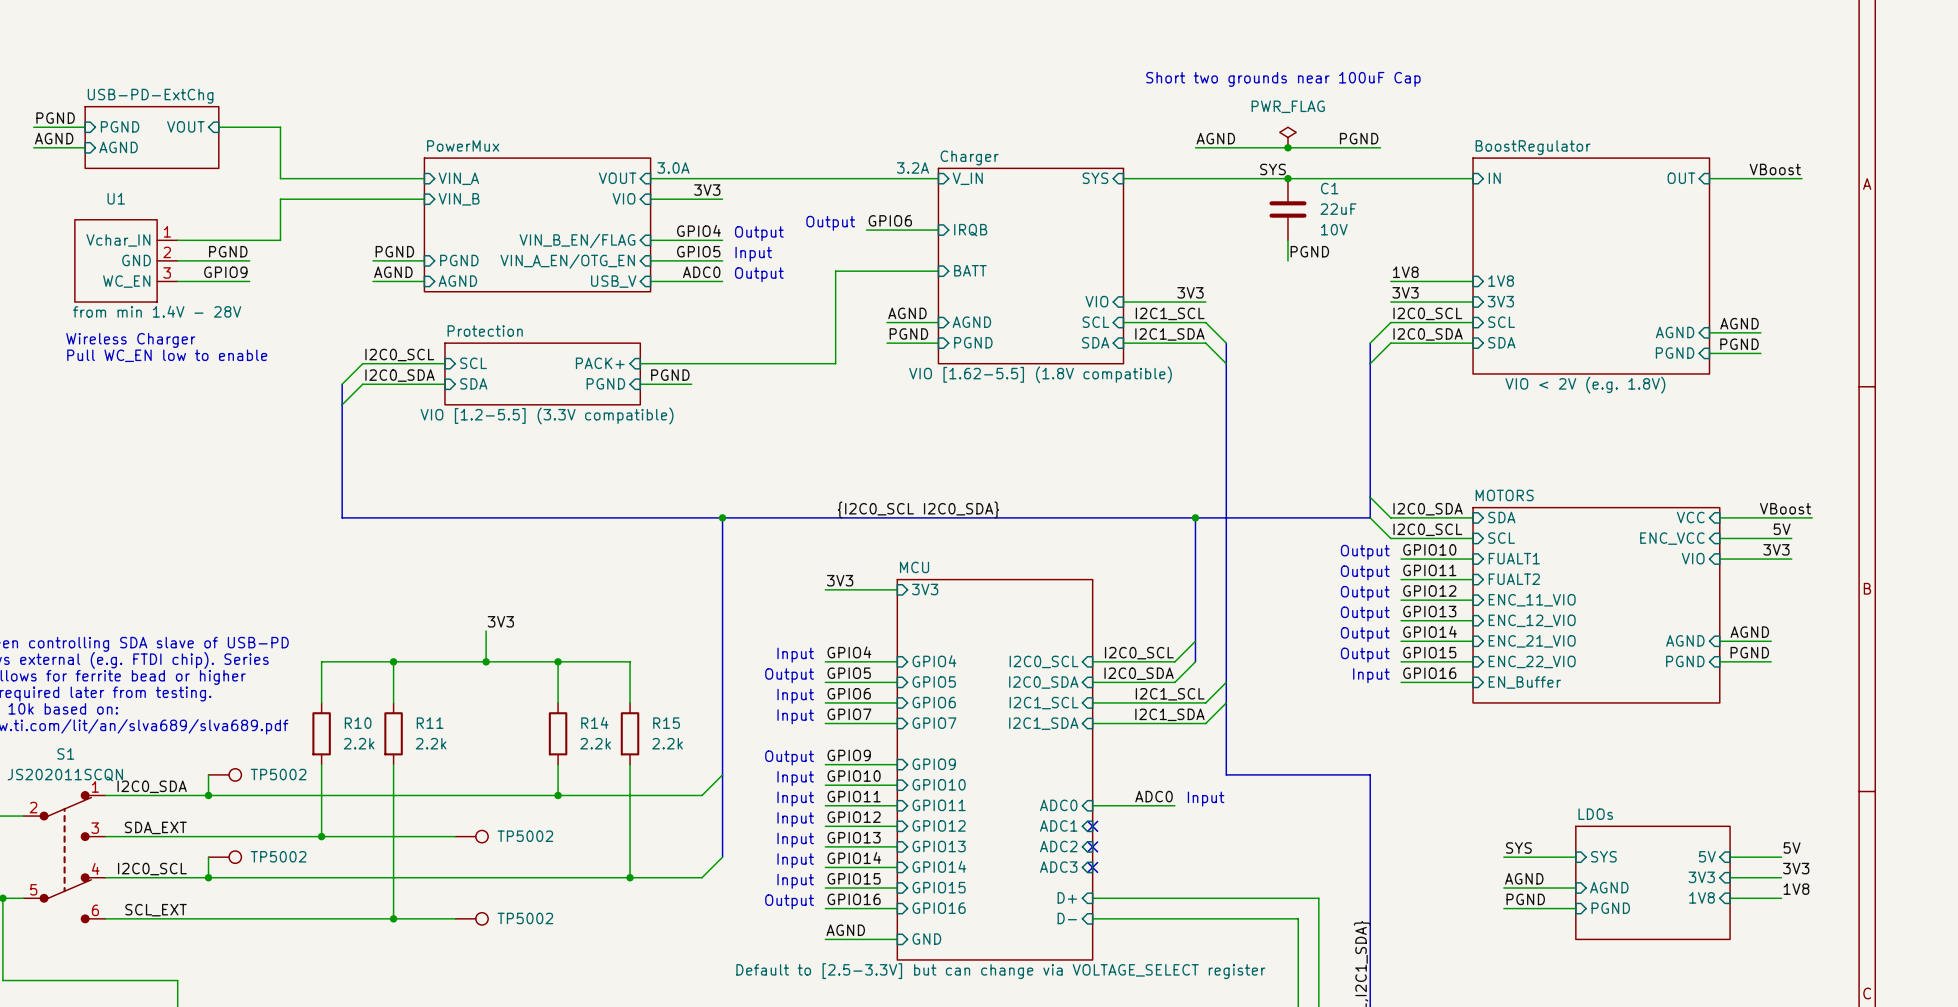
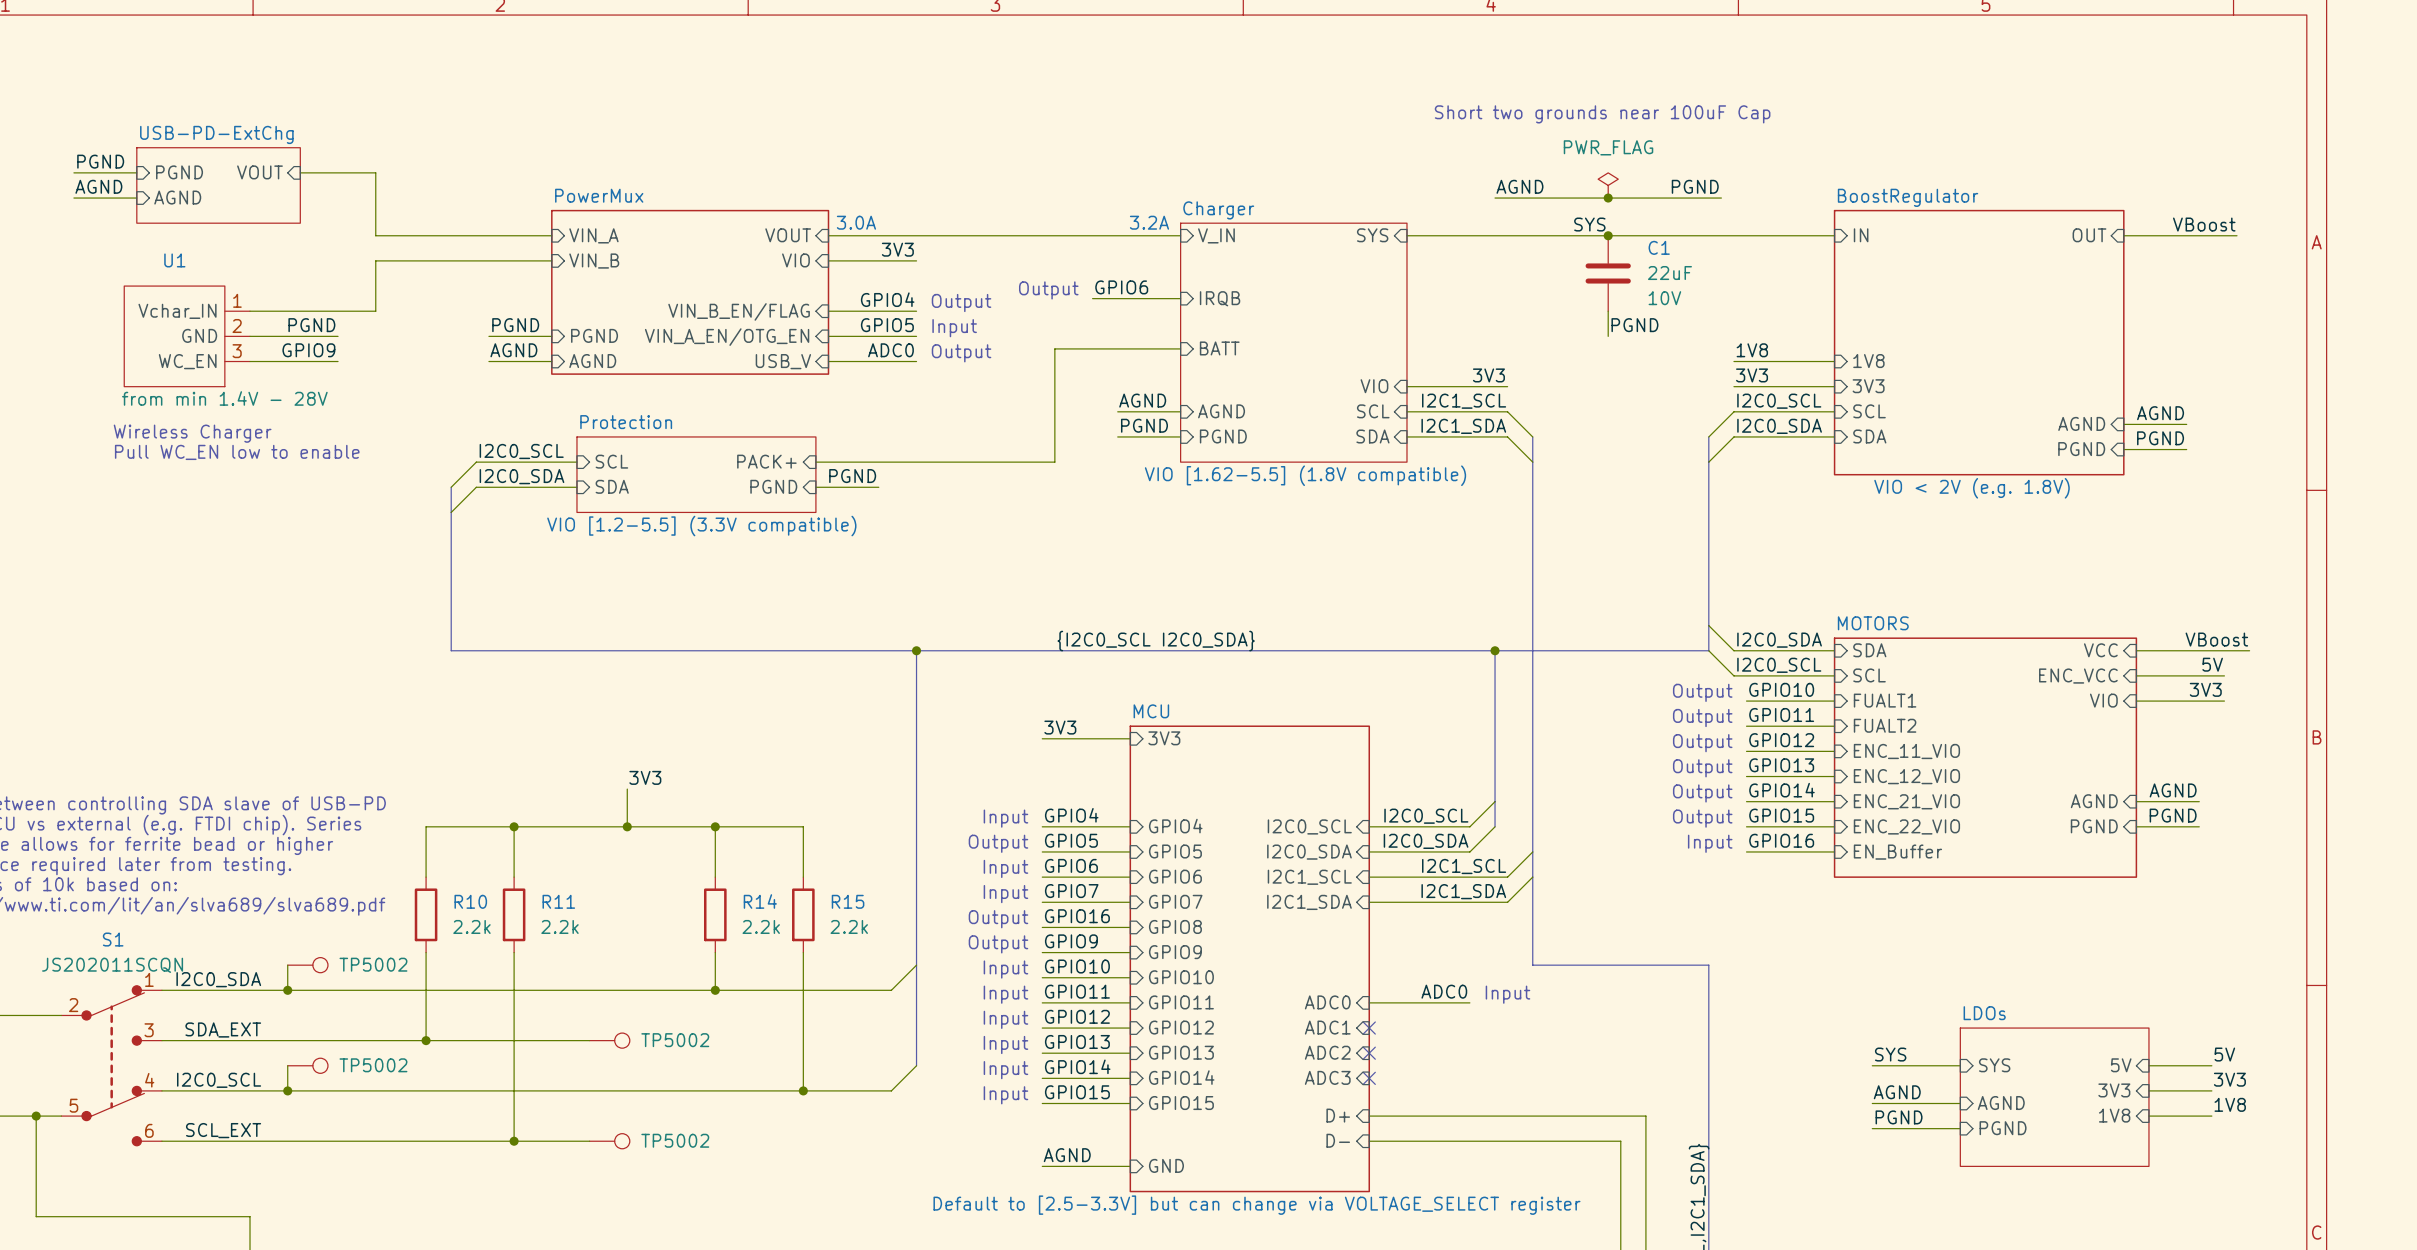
sheet pin: none -> GPIO8 (1175, 926)
label position: GPIO16 (854, 899) -> GPIO16 (1077, 916)
text position: Output (789, 901) -> Output (998, 919)
wire: (825, 908) (897, 908) -> (1042, 927) (1130, 927)
sheet pin: GPIO16 (939, 908) -> none

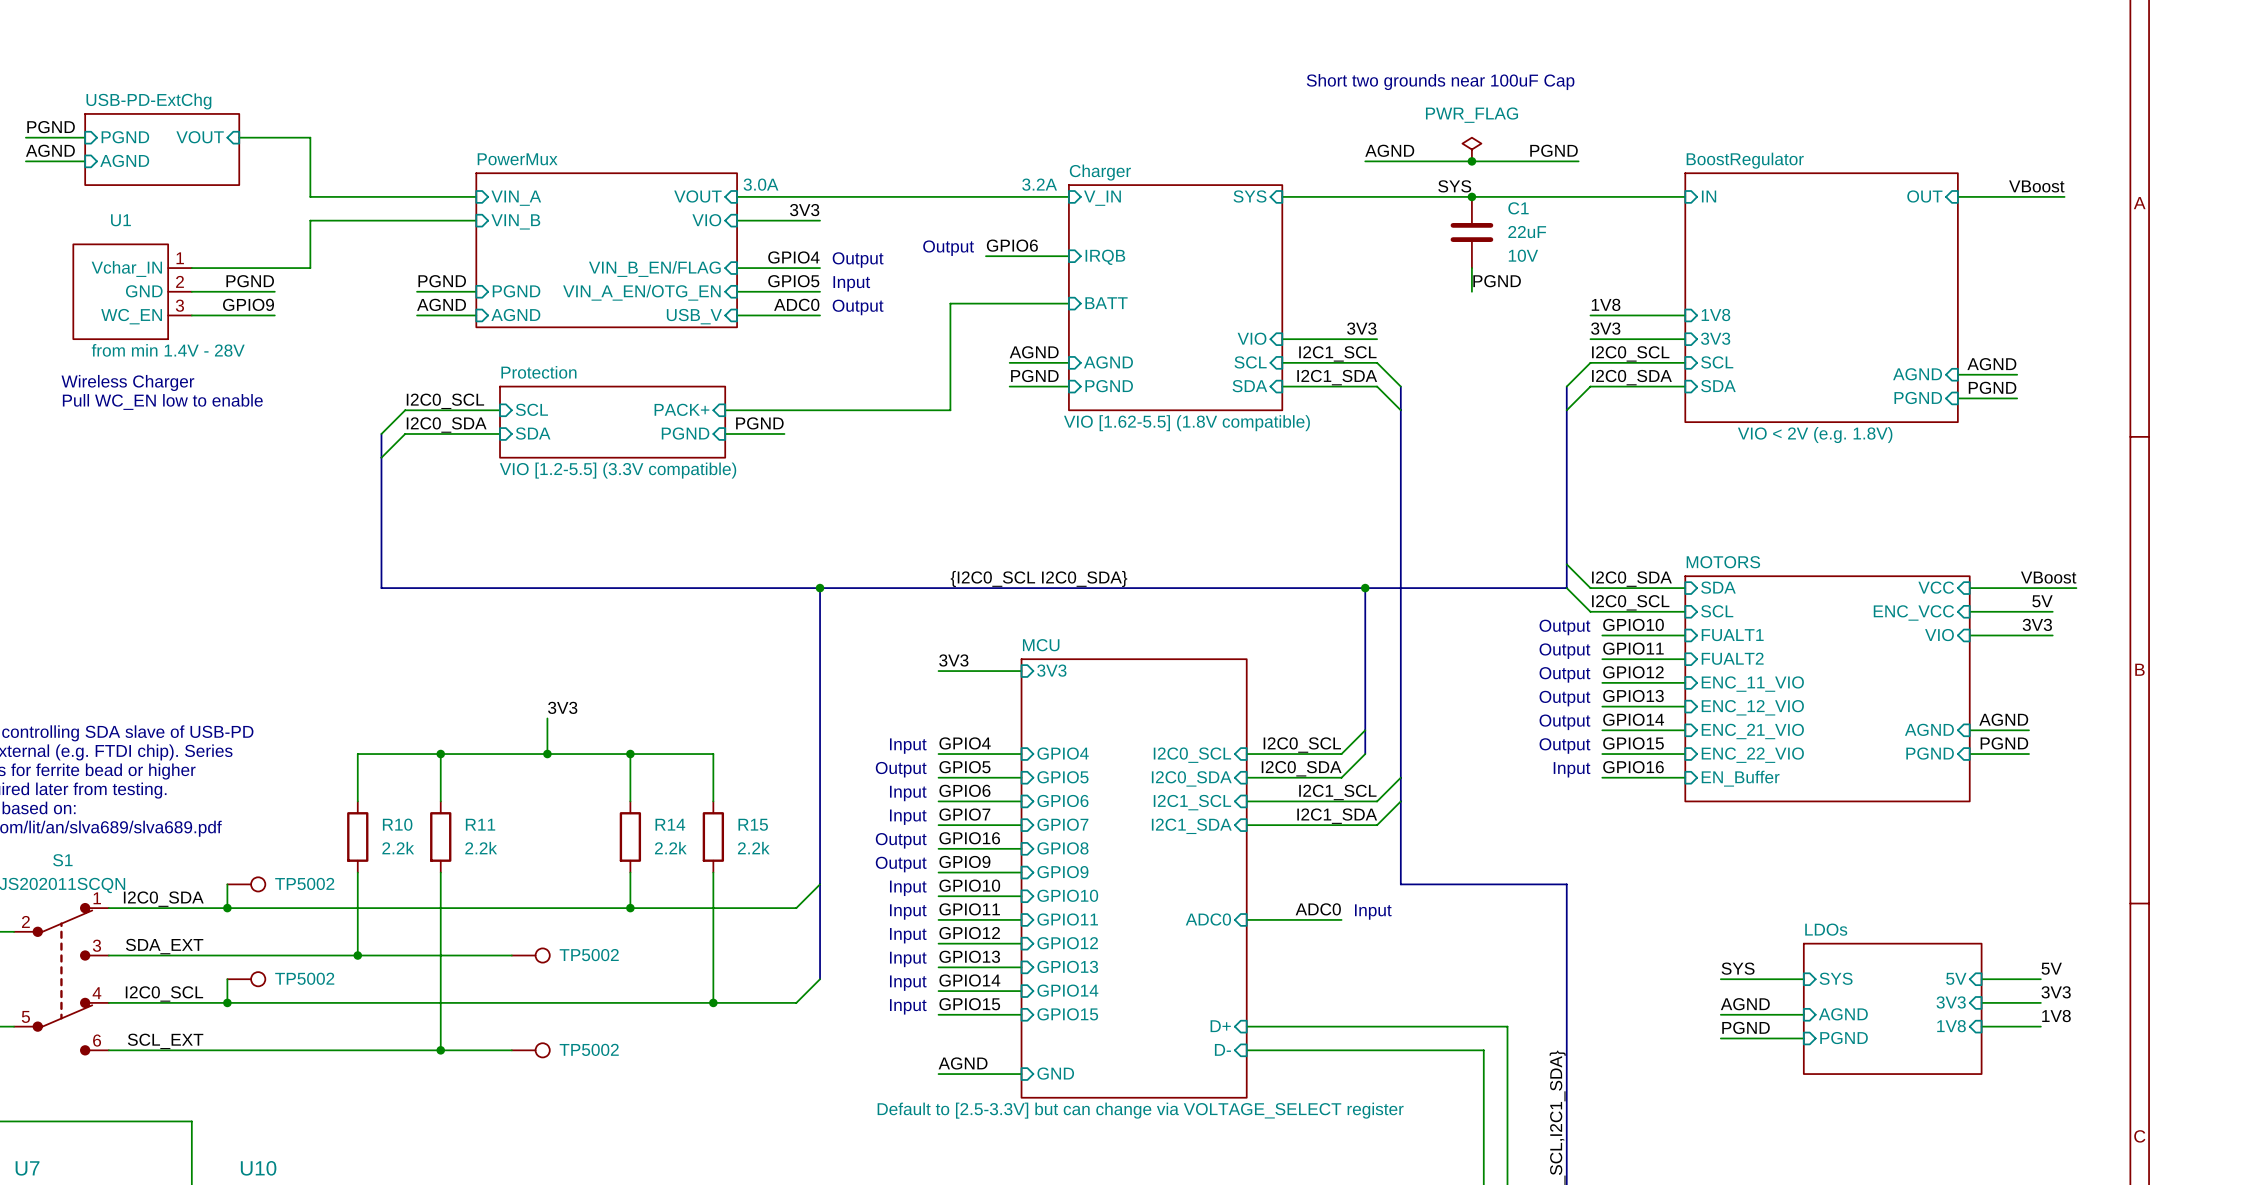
sheet pin: ADC1 (1327, 1027) -> none
no-connect mark: (1369, 1028) -> none
sheet pin: ADC2 (1327, 1052) -> none
no-connect mark: (1369, 1053) -> none
sheet pin: ADC3 (1327, 1077) -> none
no-connect mark: (1369, 1078) -> none

